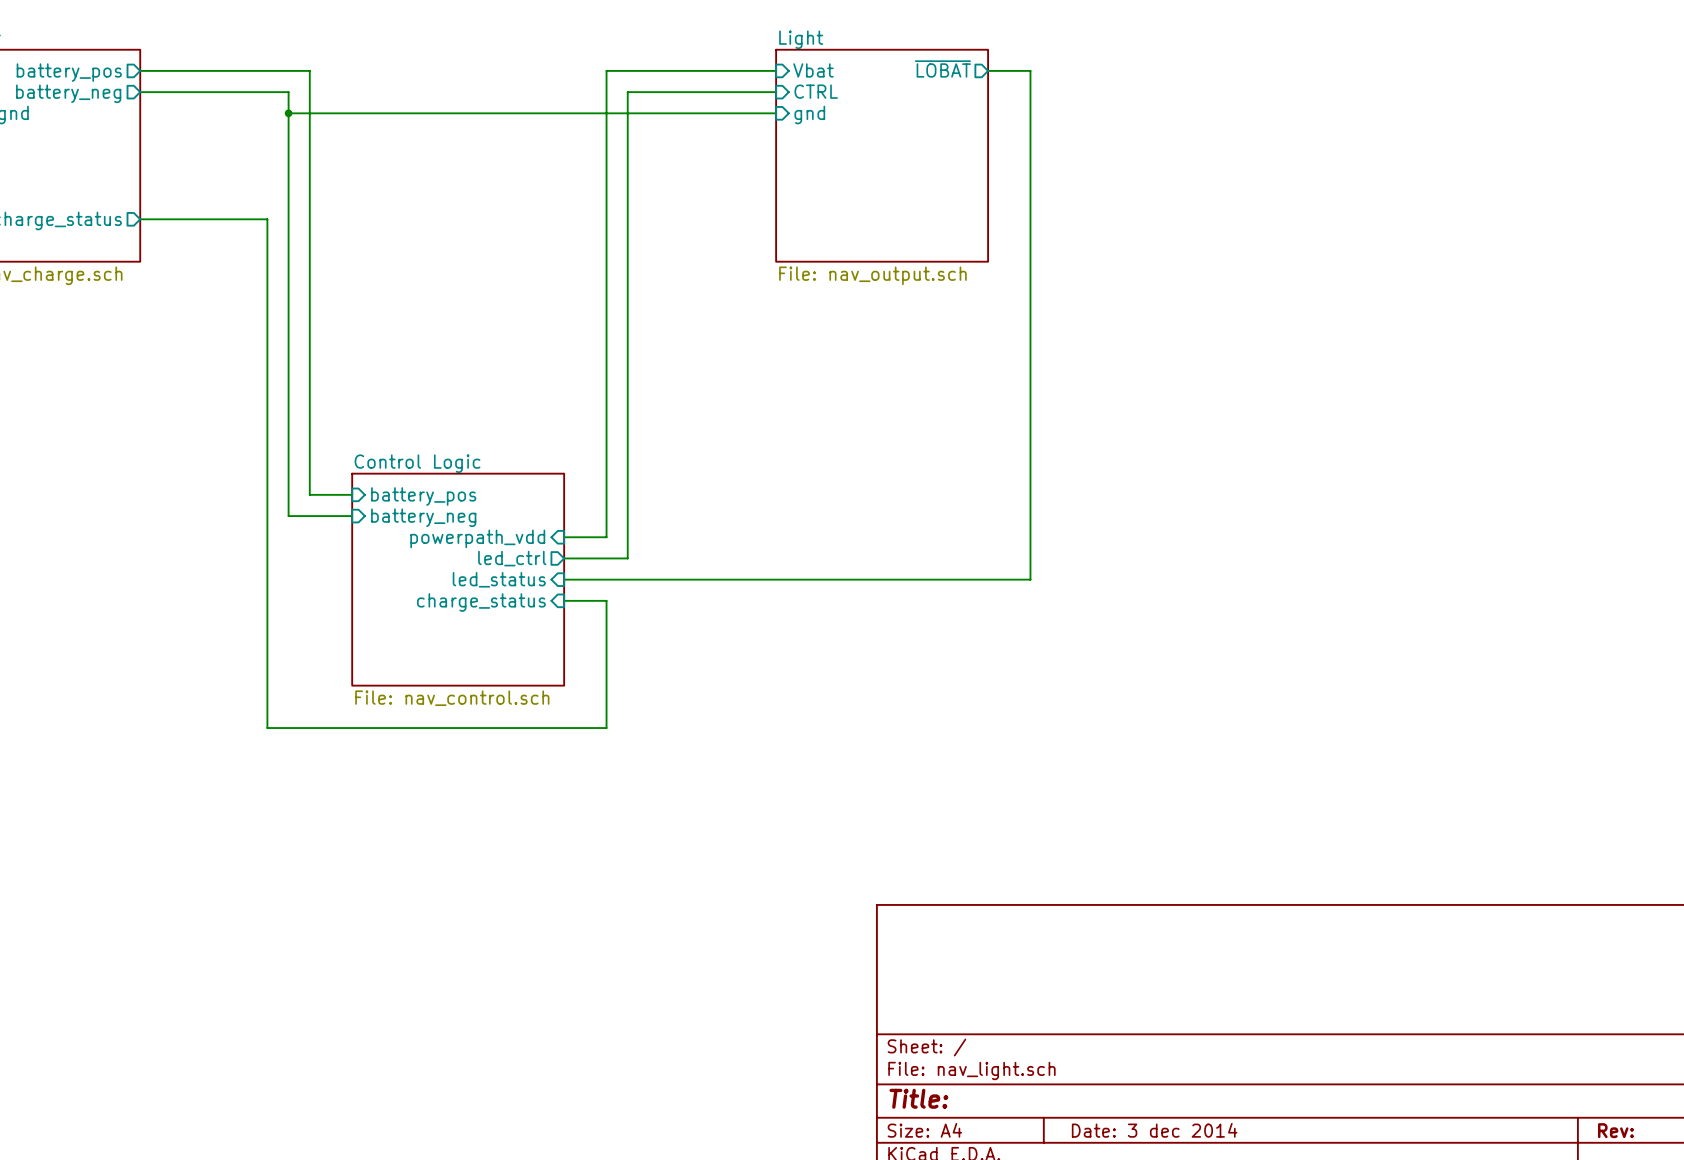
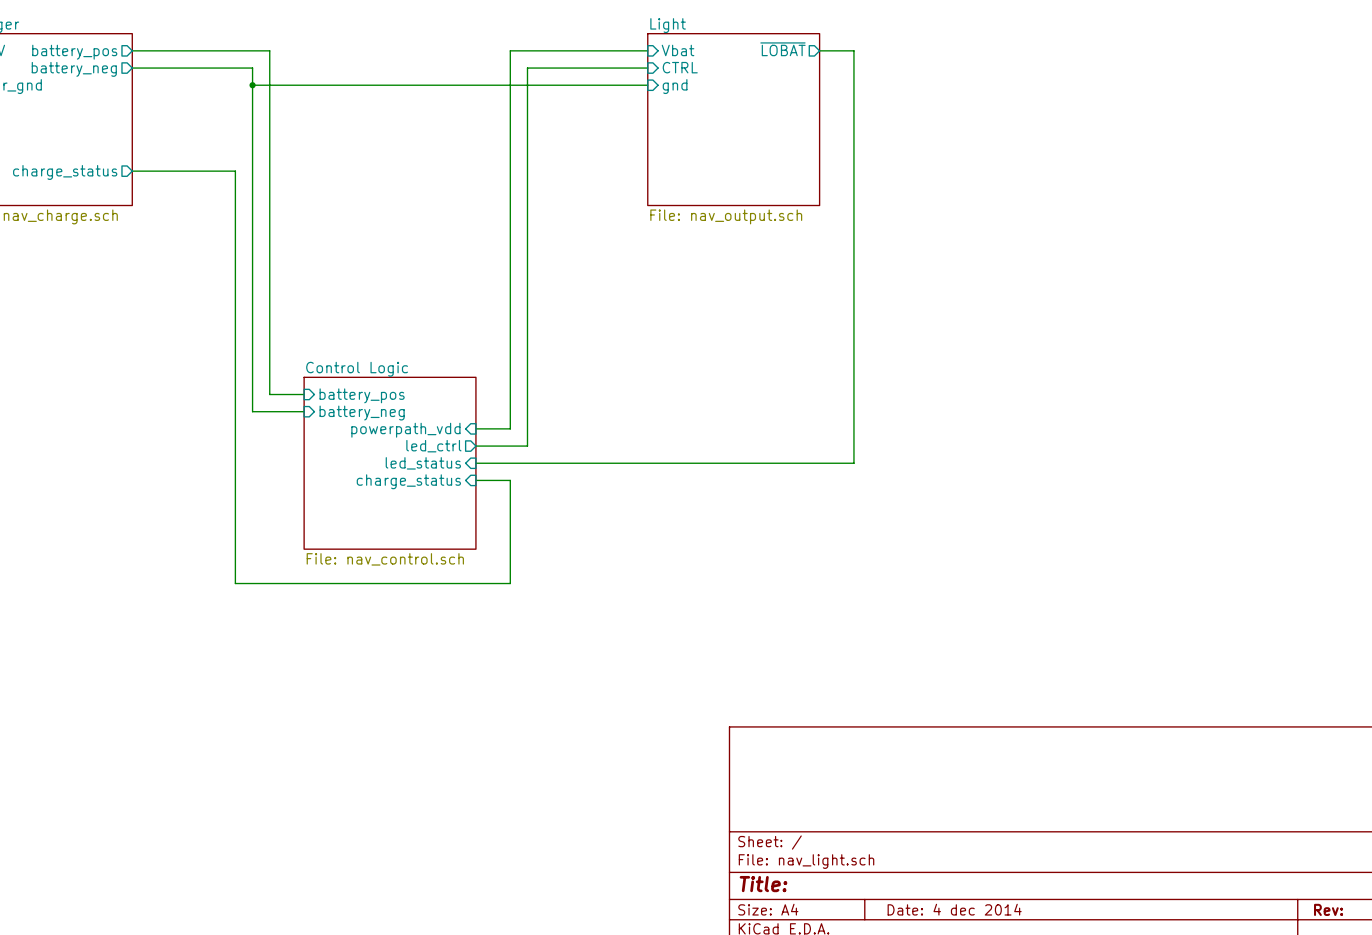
title block: Date: 3 dec 2014 (1154, 1130) -> Date: 4 dec 2014 (954, 909)

